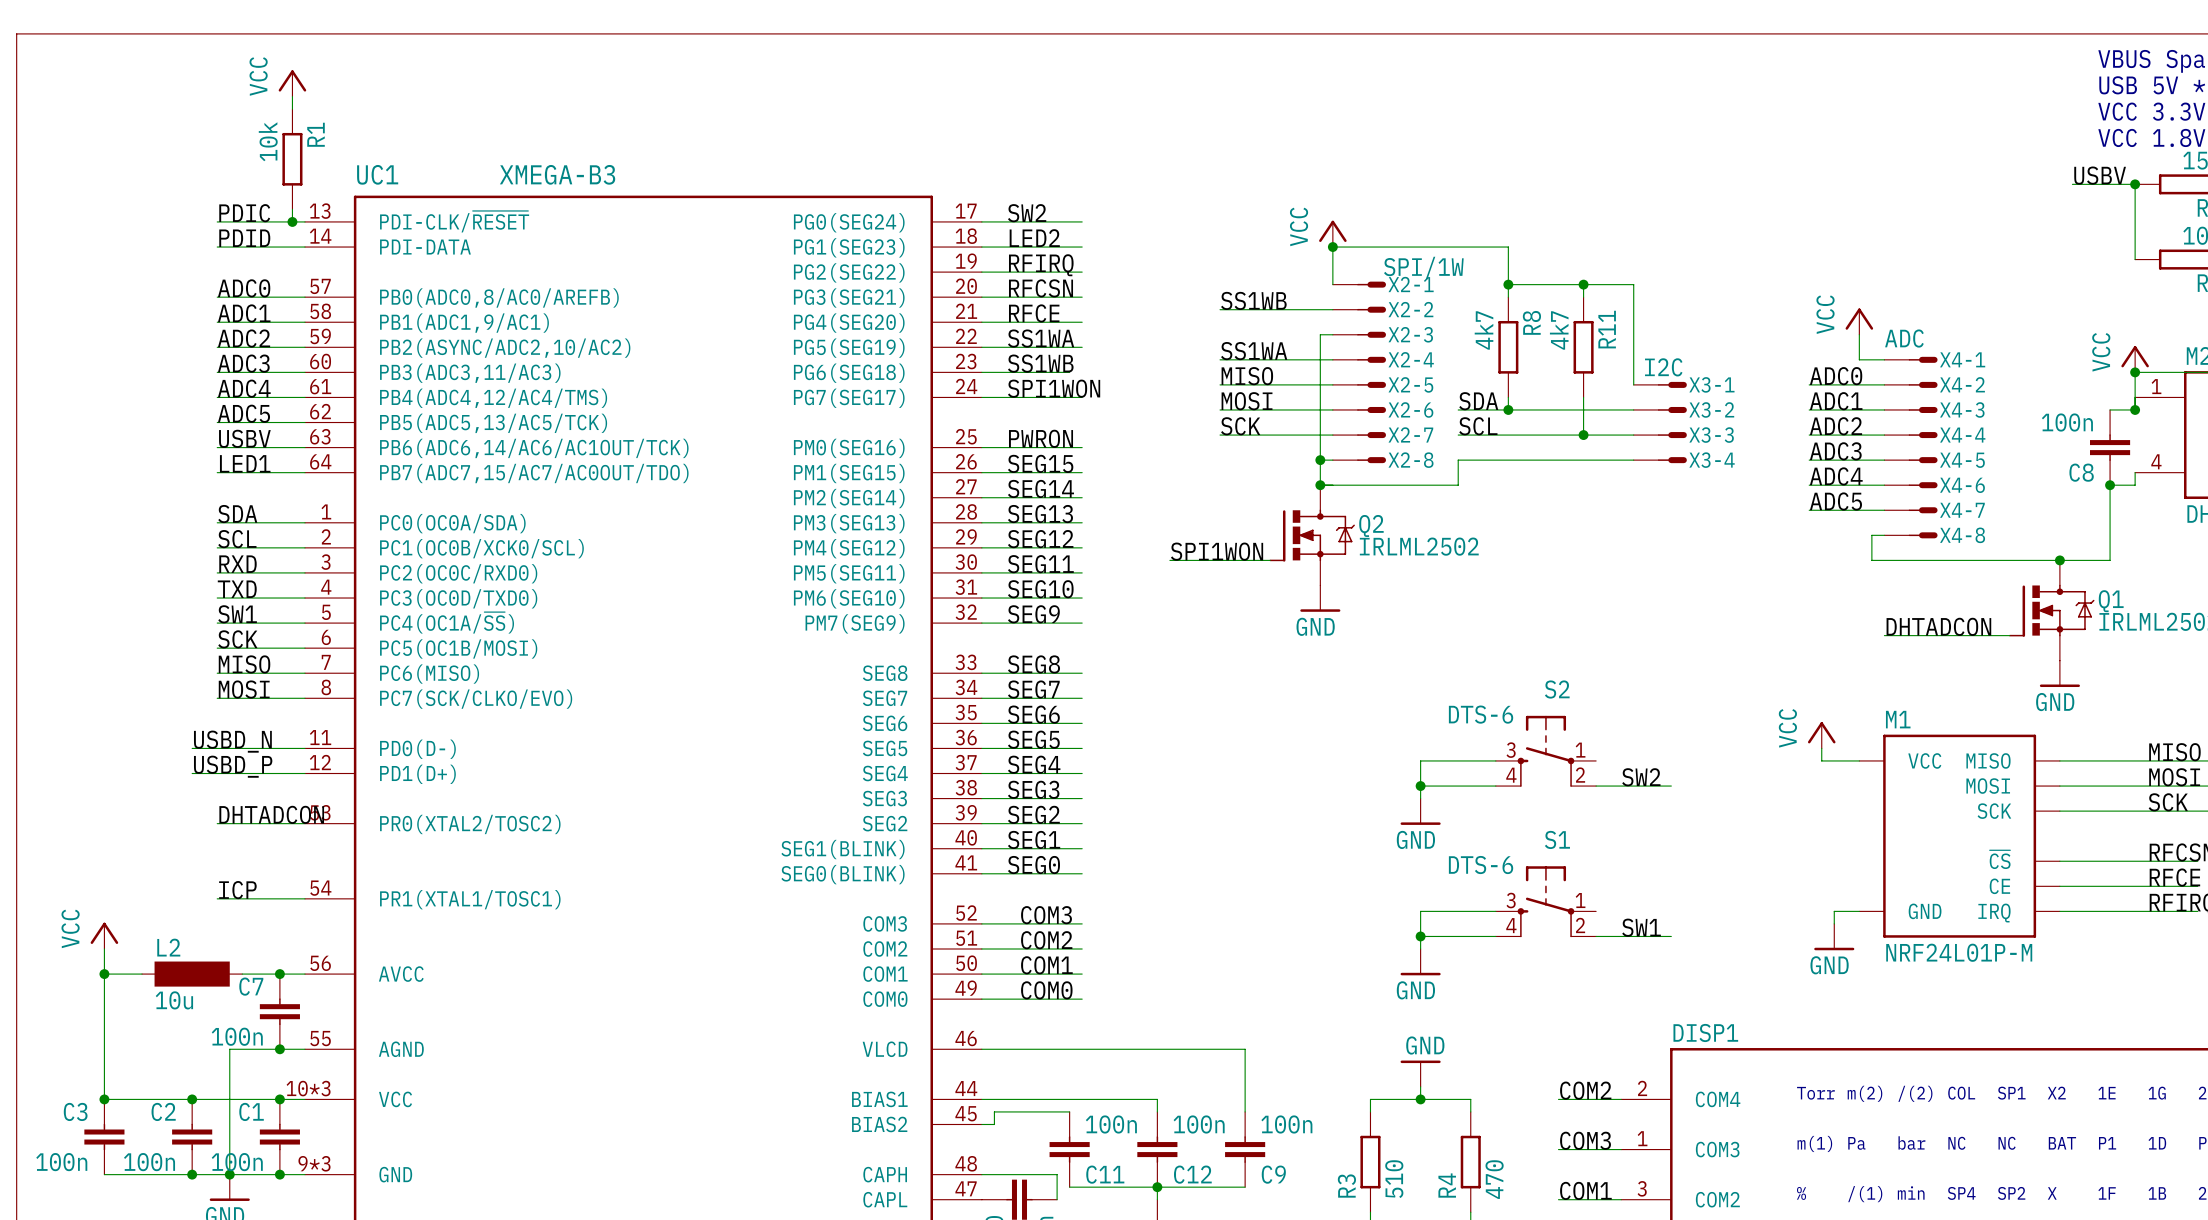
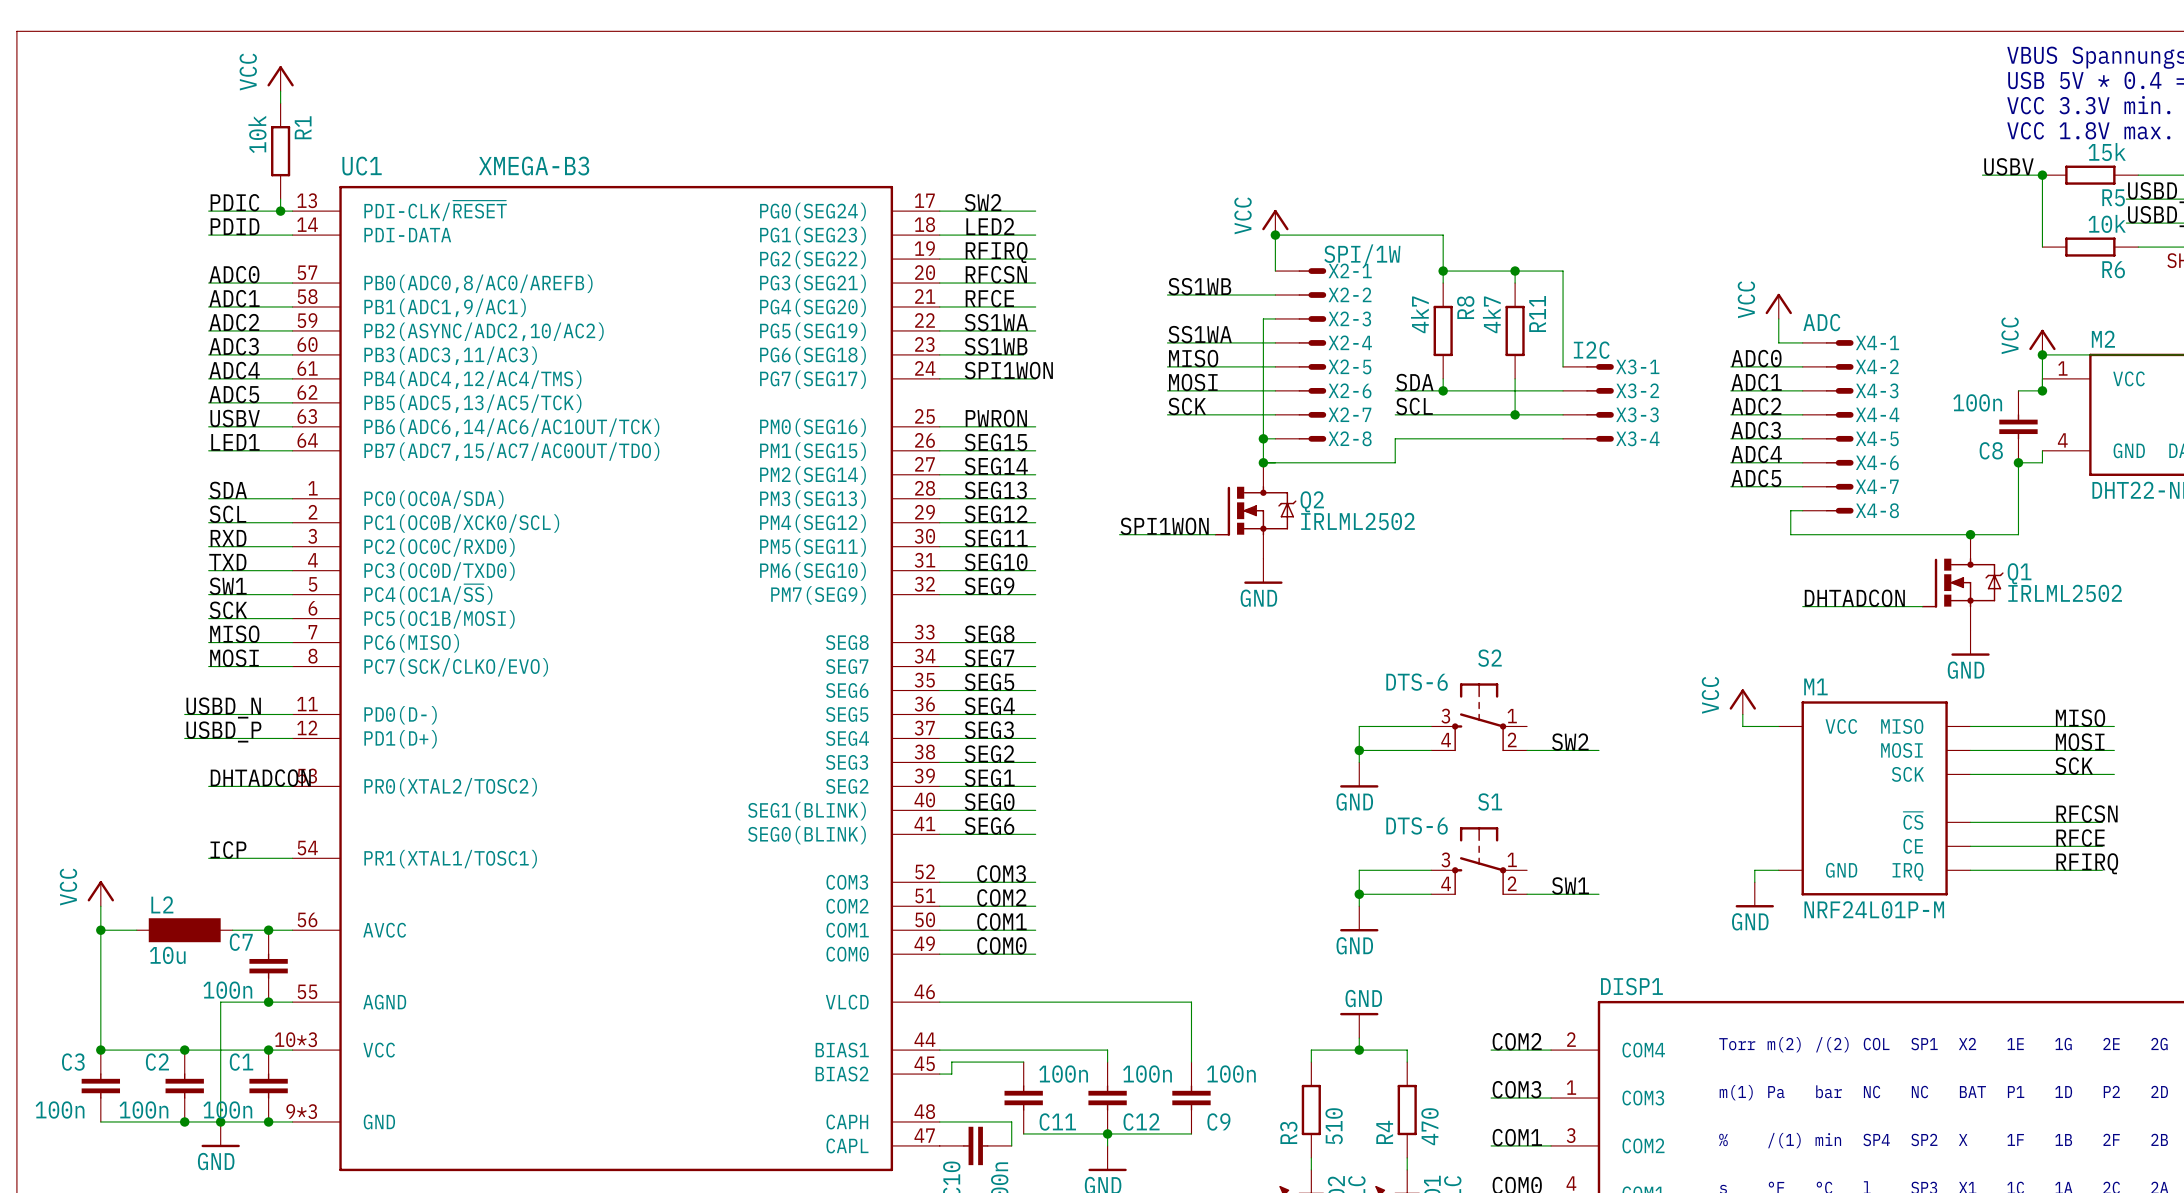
label: SEG6 (1033, 714) -> SEG5 (989, 682)
label: SEG5 (1033, 739) -> SEG4 (989, 706)
label: SEG4 (1034, 764) -> SEG3 (989, 730)
label: SEG3 (1033, 789) -> SEG2 (989, 754)
label: SEG2 (1033, 814) -> SEG1 (989, 778)
label: SEG1 (1034, 839) -> SEG0 (989, 801)
label: SEG0 (1033, 865) -> SEG6 (989, 825)

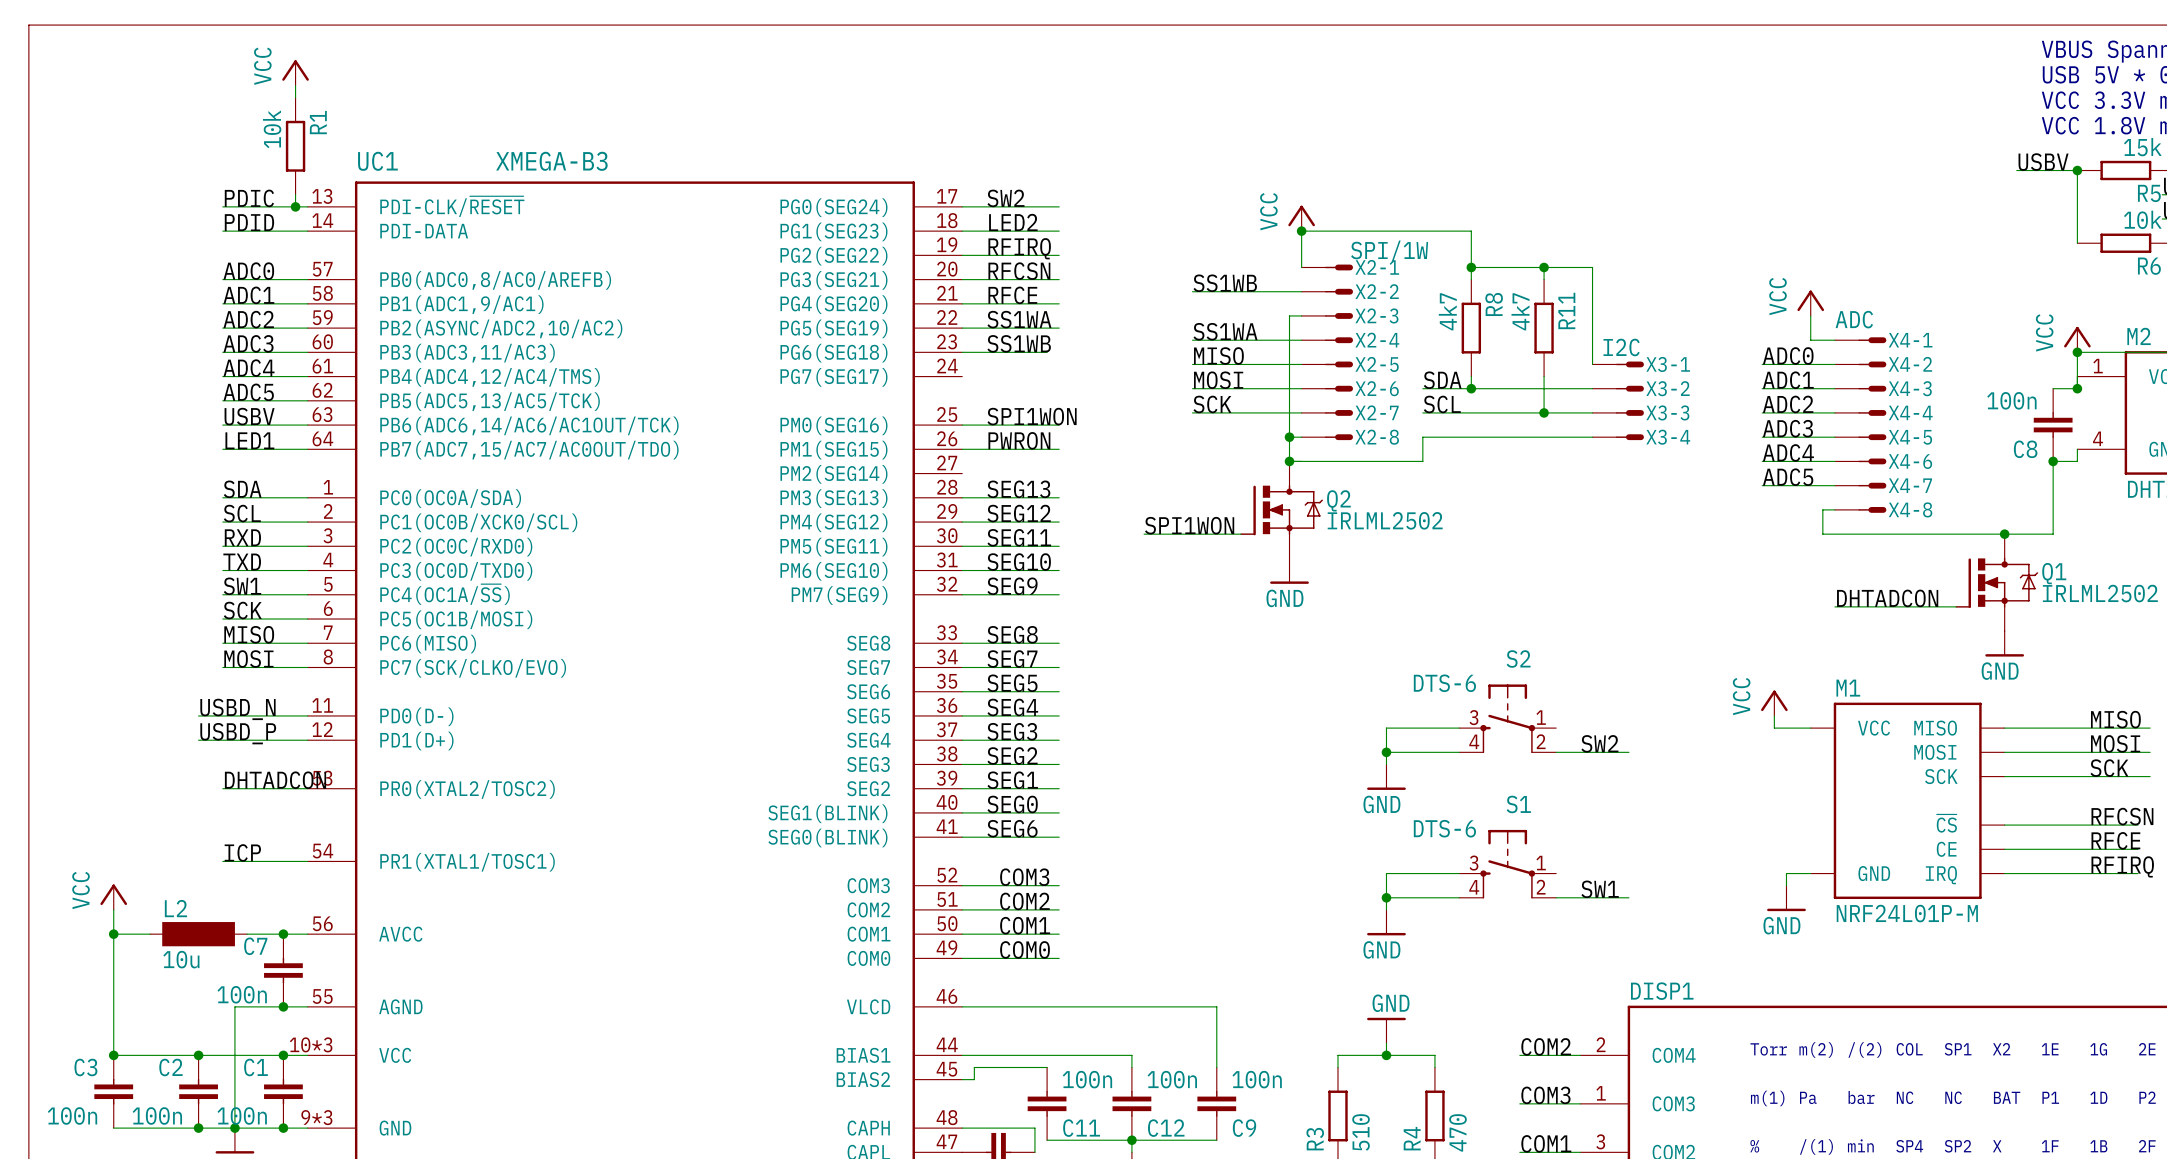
label: SPI1WON (1008, 370) -> none
wire: (939, 378) (1035, 378) -> none
label: PWRON (996, 418) -> SPI1WON (1032, 416)
label: SEG15 (995, 442) -> PWRON (1019, 440)
label: SEG14 (996, 466) -> none
wire: (939, 474) (1035, 474) -> none

